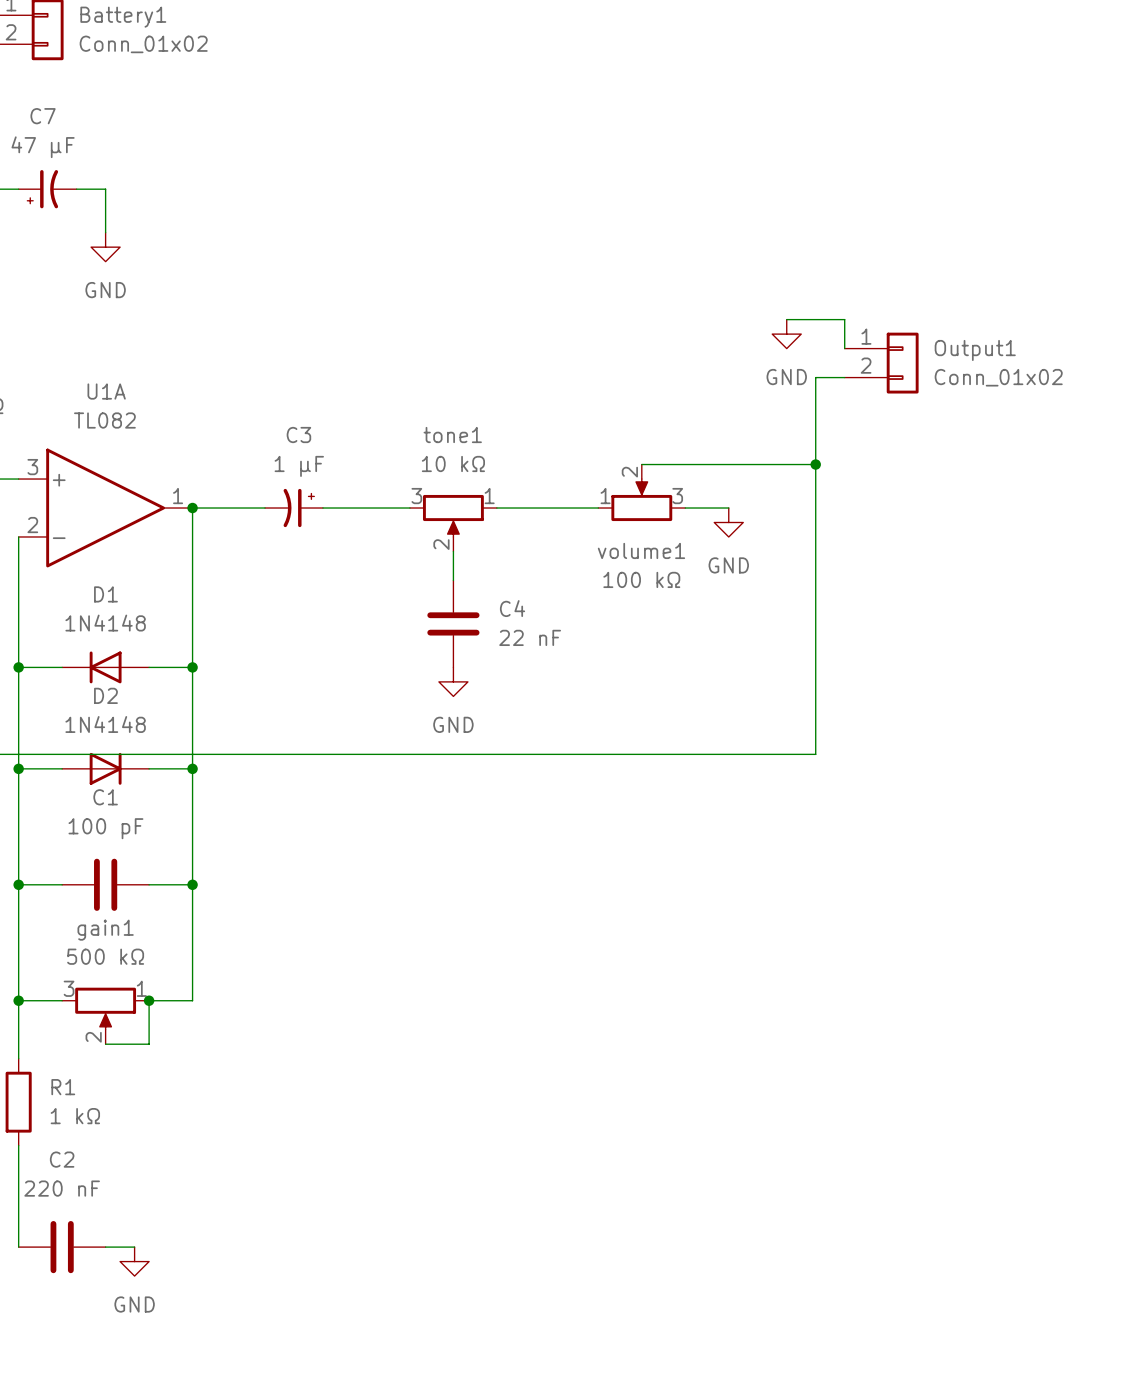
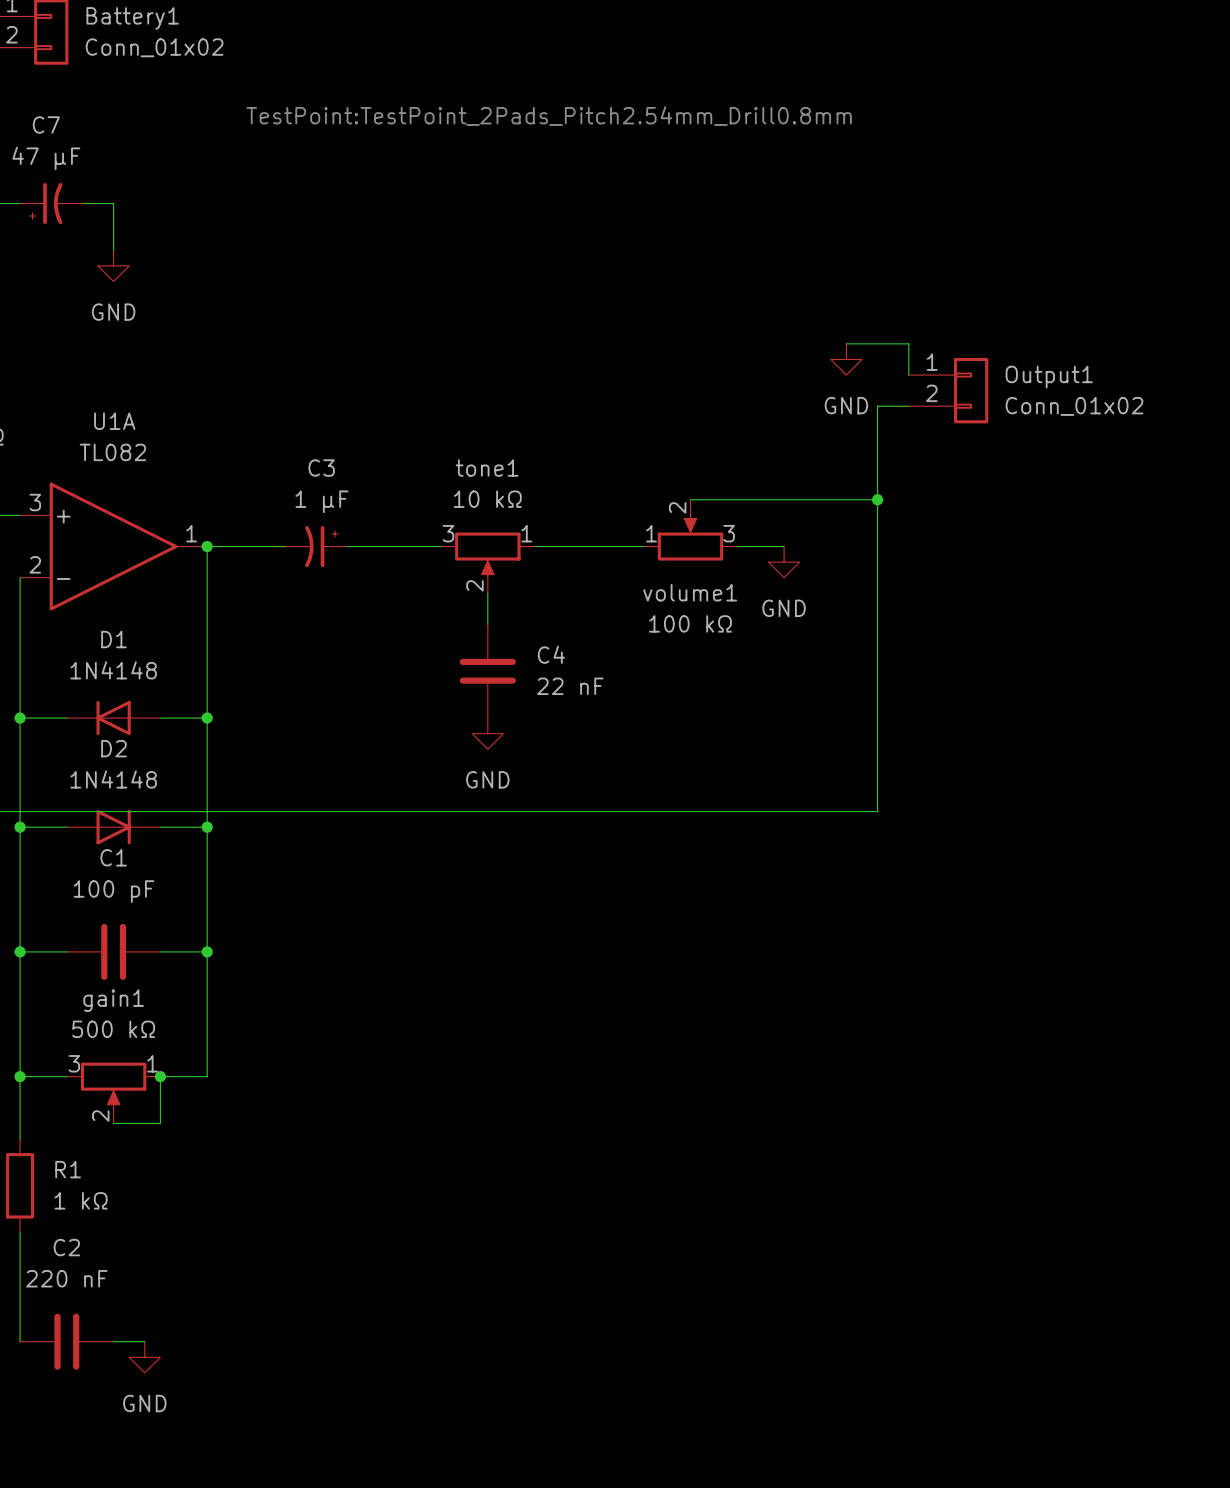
text: none -> TestPoint:TestPoint_2Pads_Pitch2.54mm_Drill0.8mm (549, 116)

